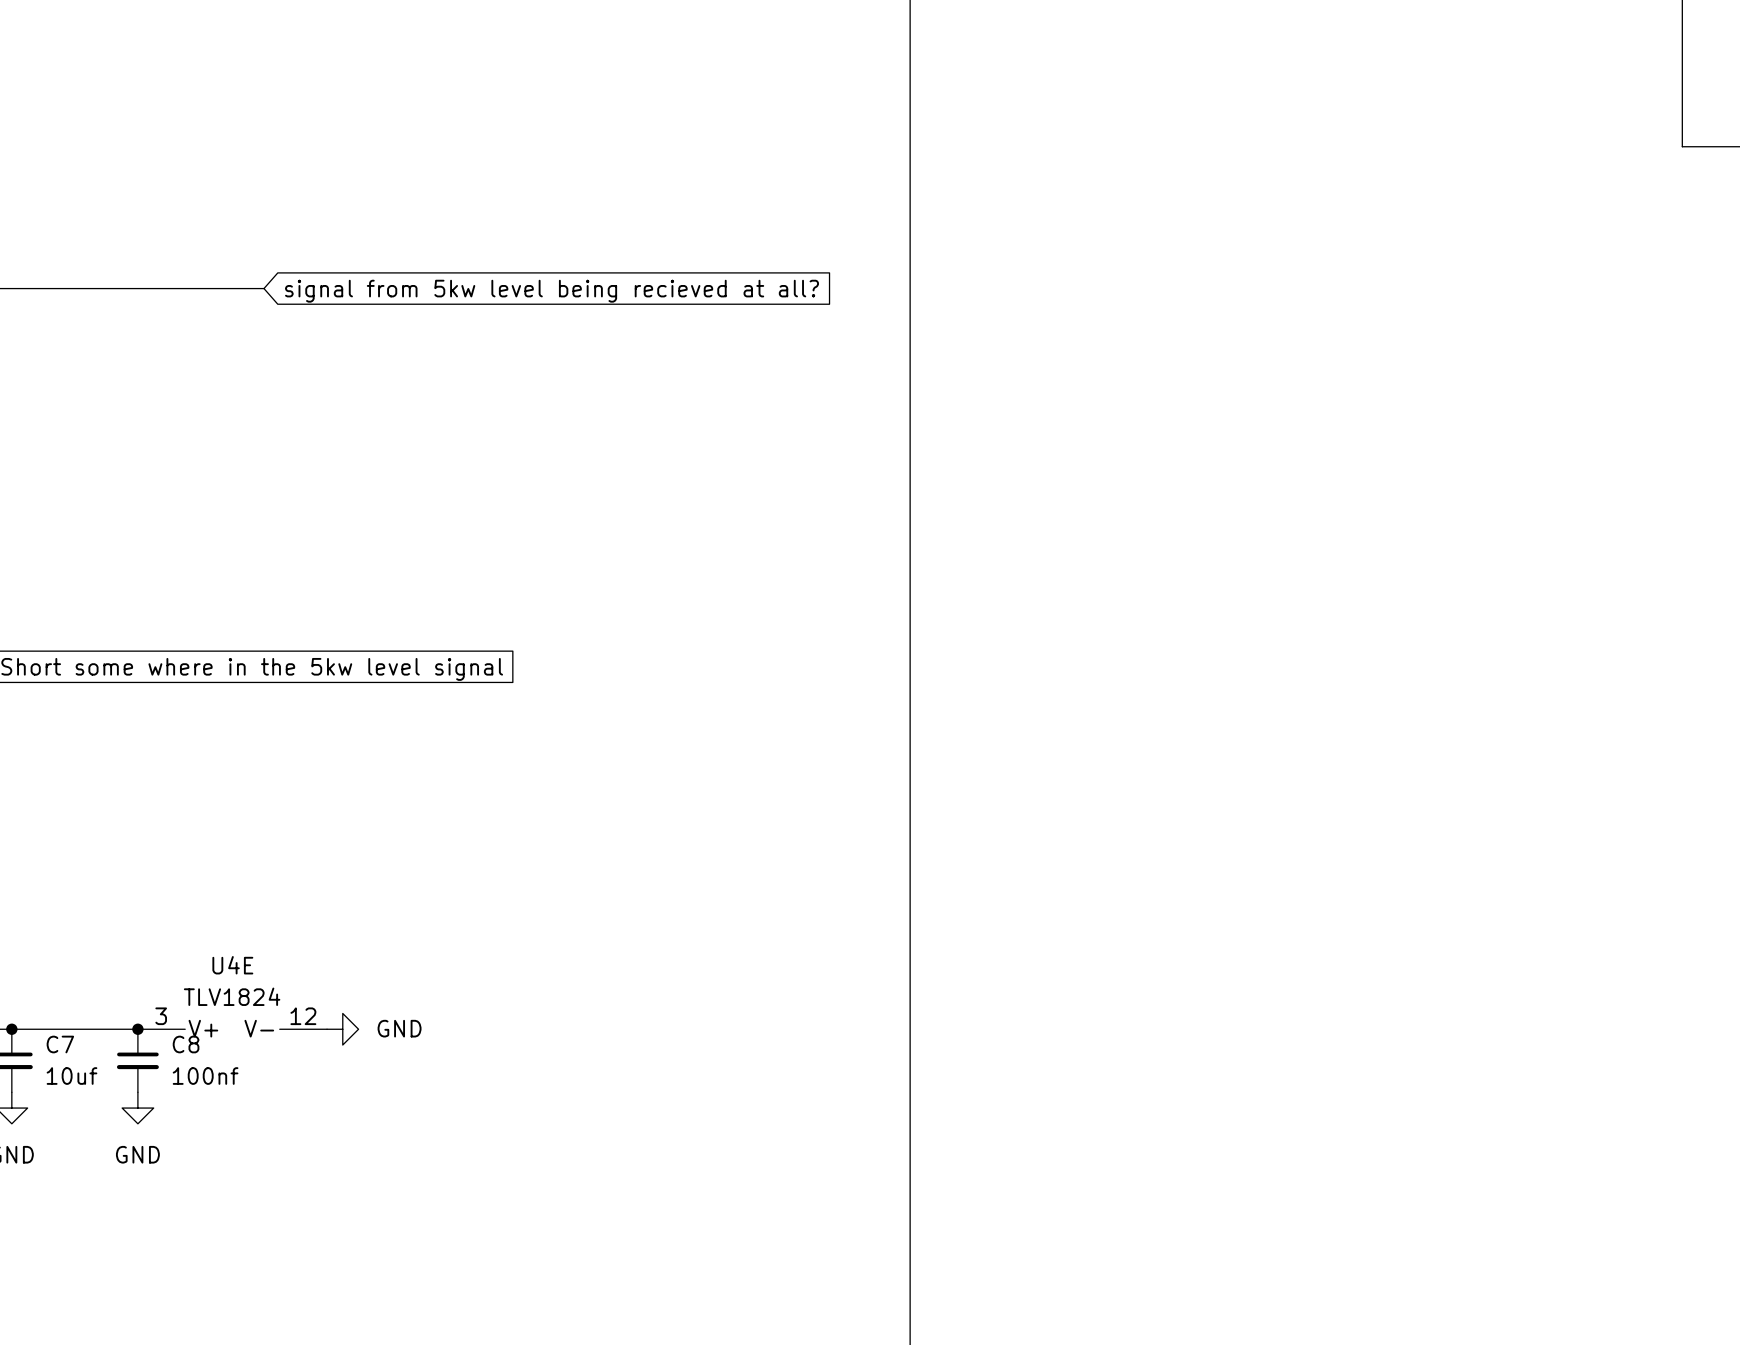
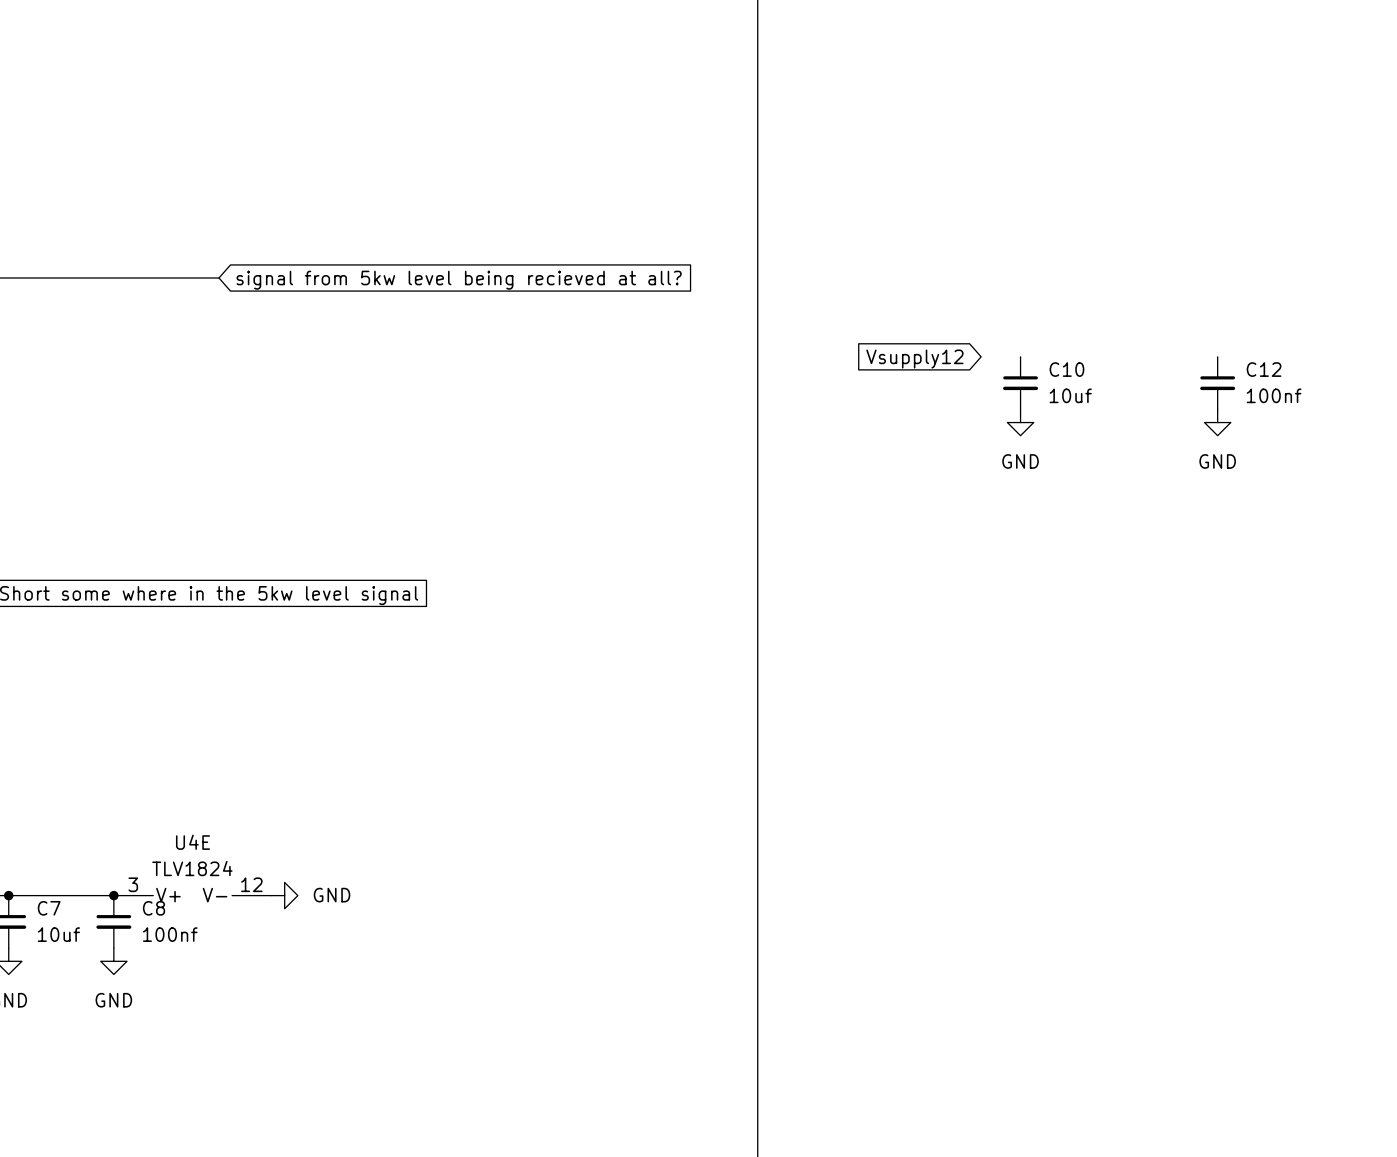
global label: none -> Vsupply12 (914, 359)
C10: none -> 10uf (1020, 383)
C12: none -> 100nf (1217, 383)
power symbol: none -> GND (1020, 422)
power symbol: none -> GND (1217, 422)

